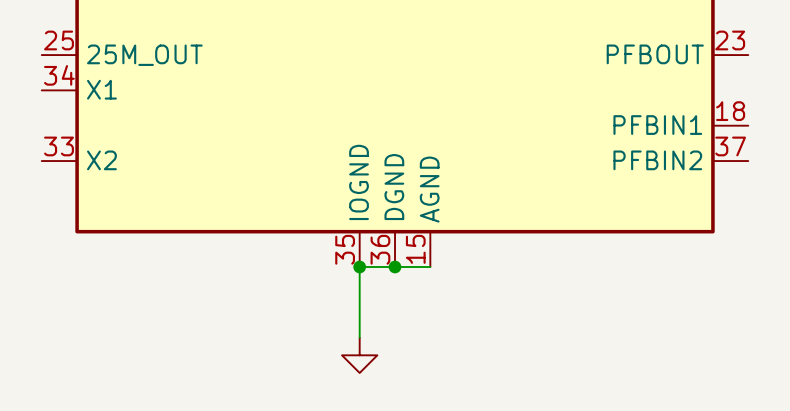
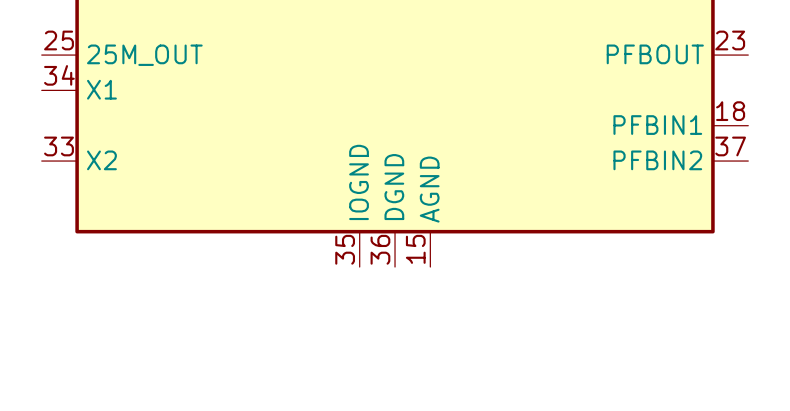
junction: (359, 267) -> none
junction: (395, 267) -> none
wire: (430, 267) (359, 267) (359, 337) -> none
power symbol: (359, 355) -> none

